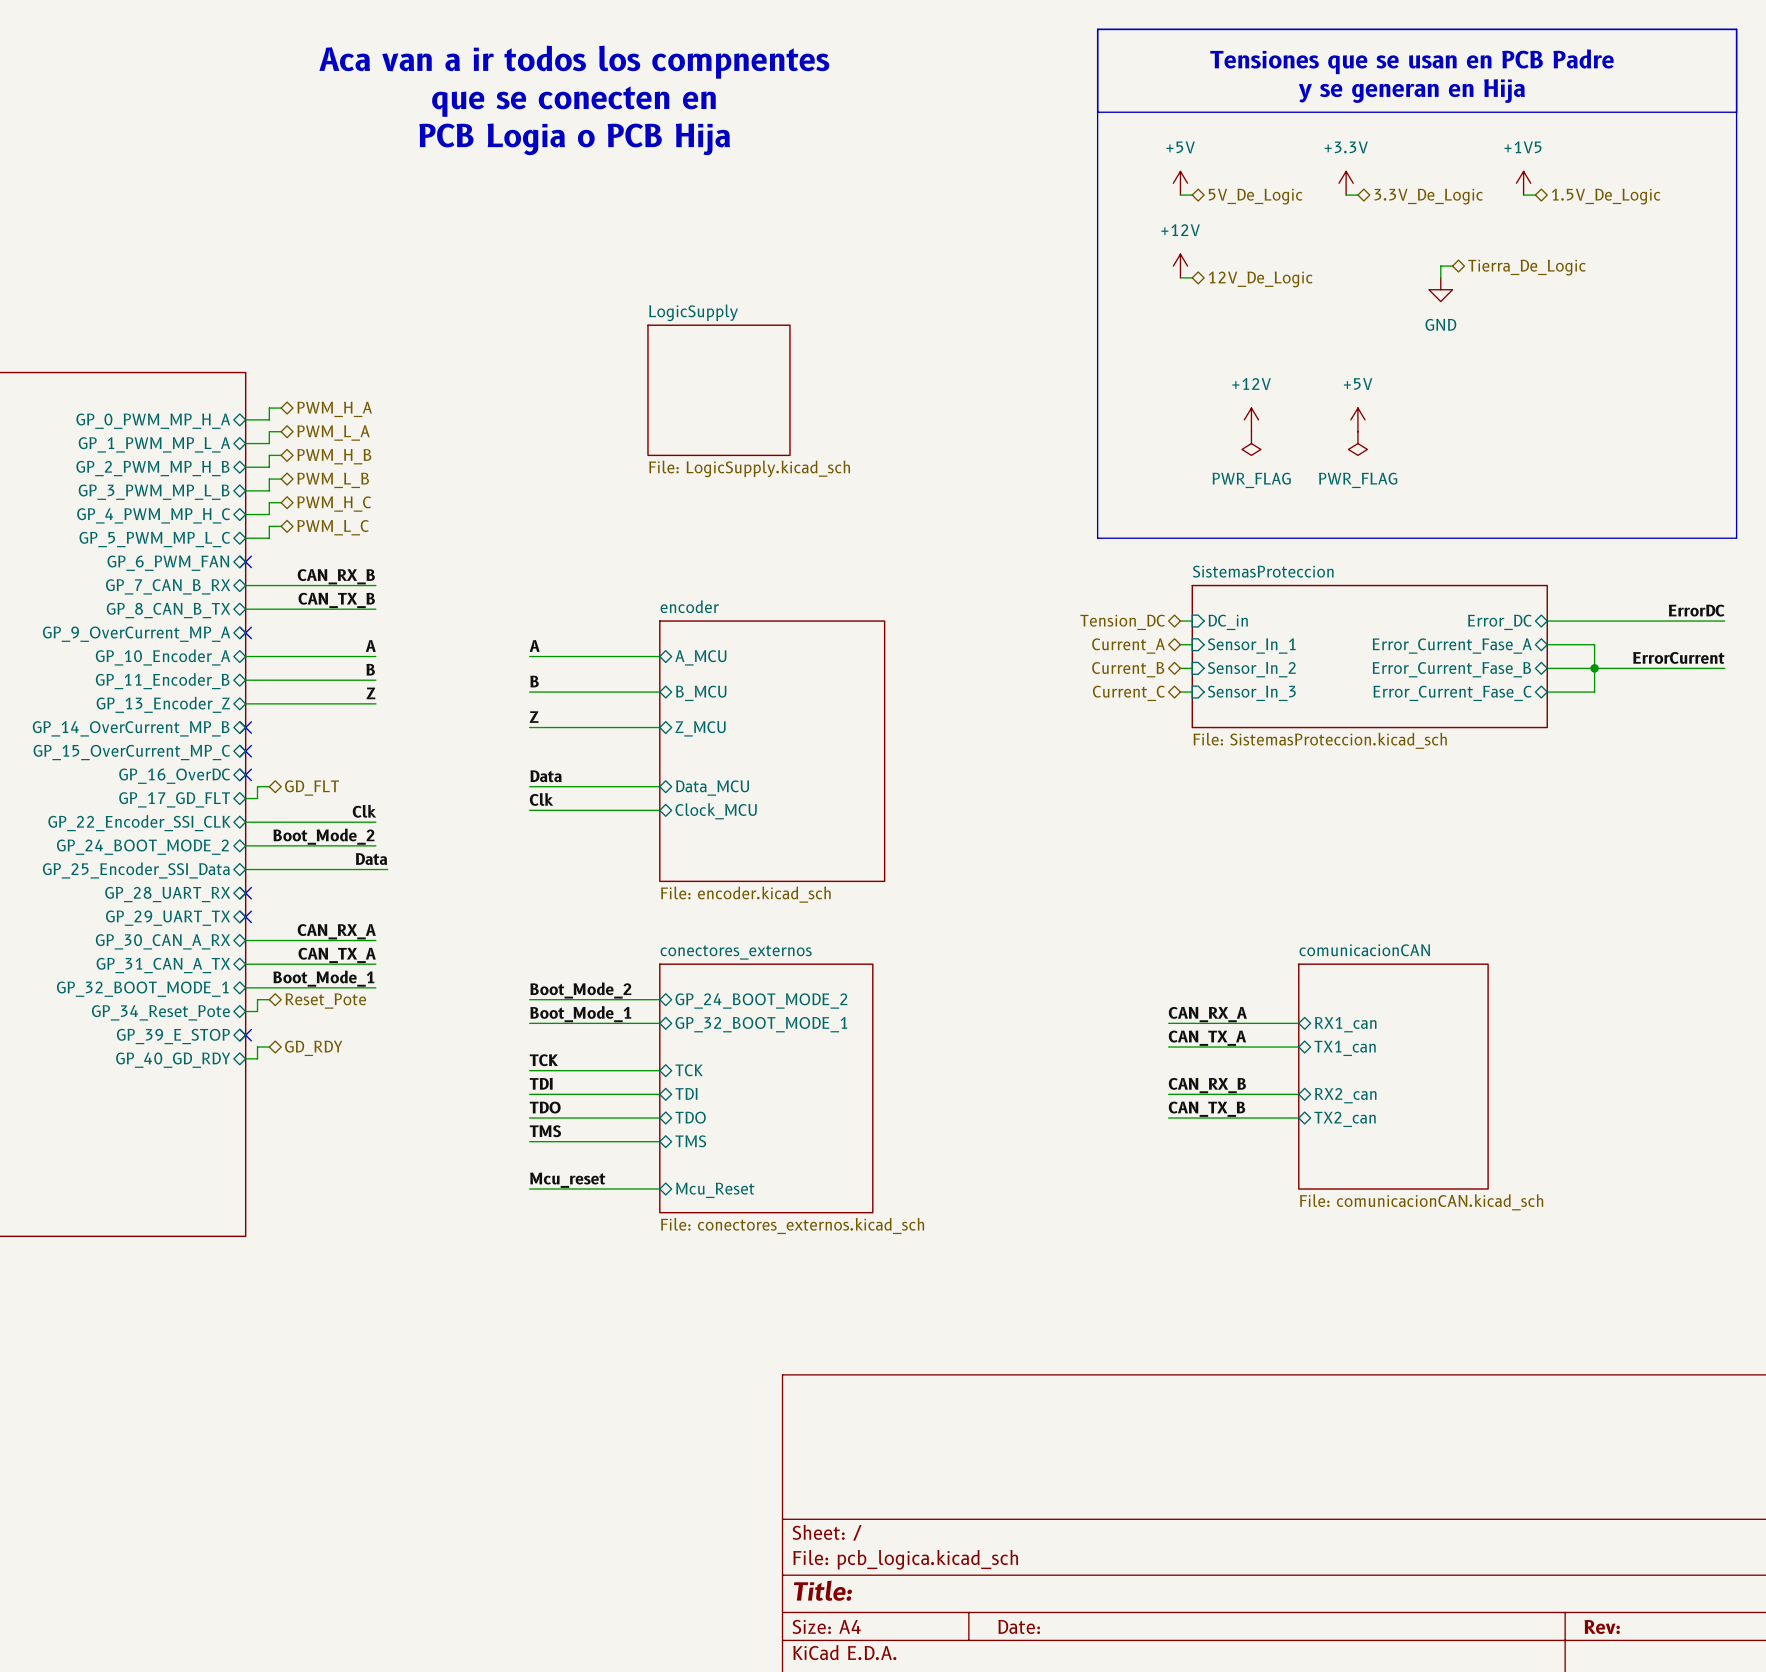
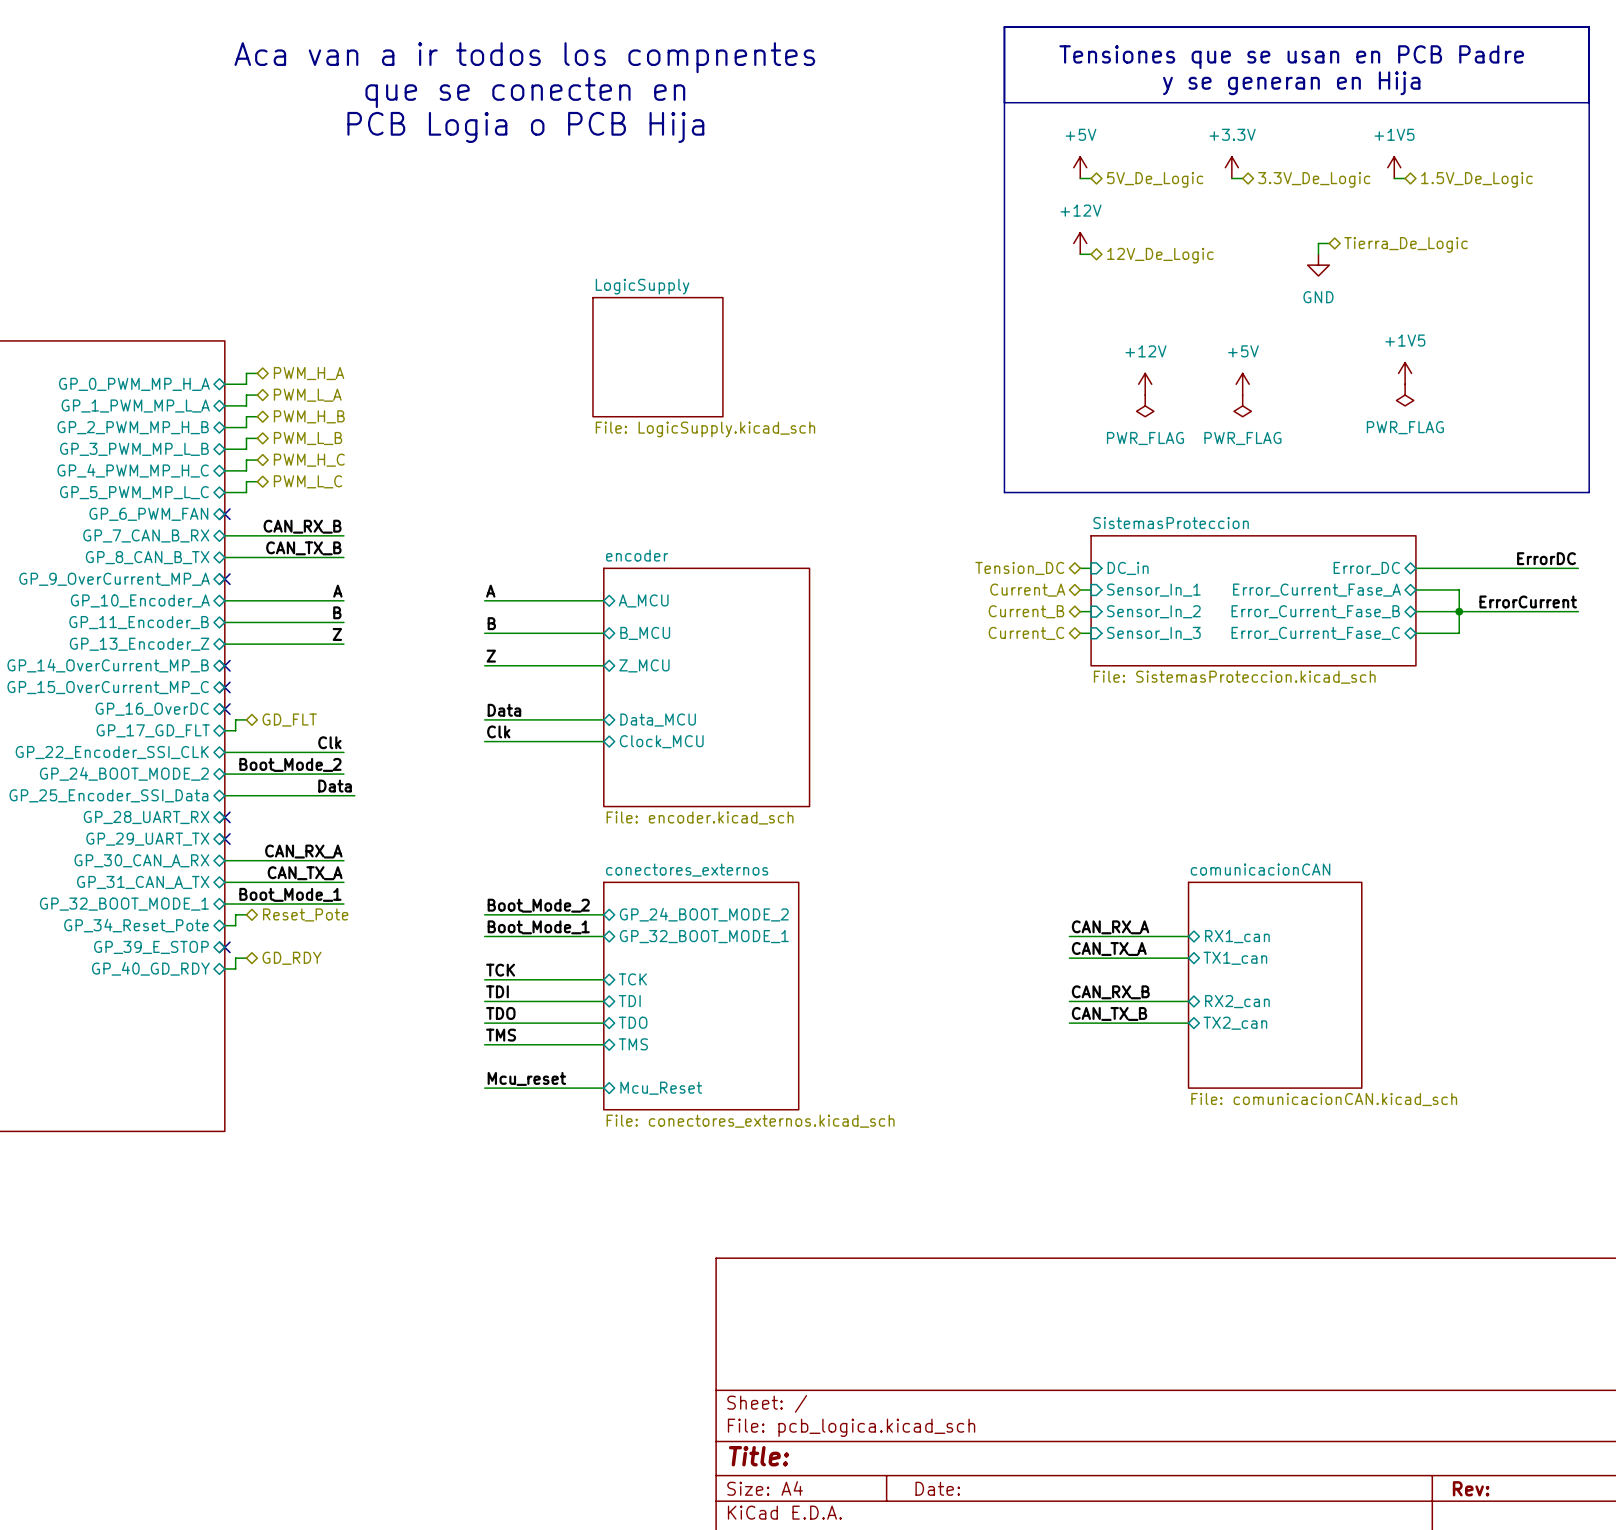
power symbol: none -> +1V5 (1405, 373)
power symbol: none -> PWR_FLAG (1405, 395)

